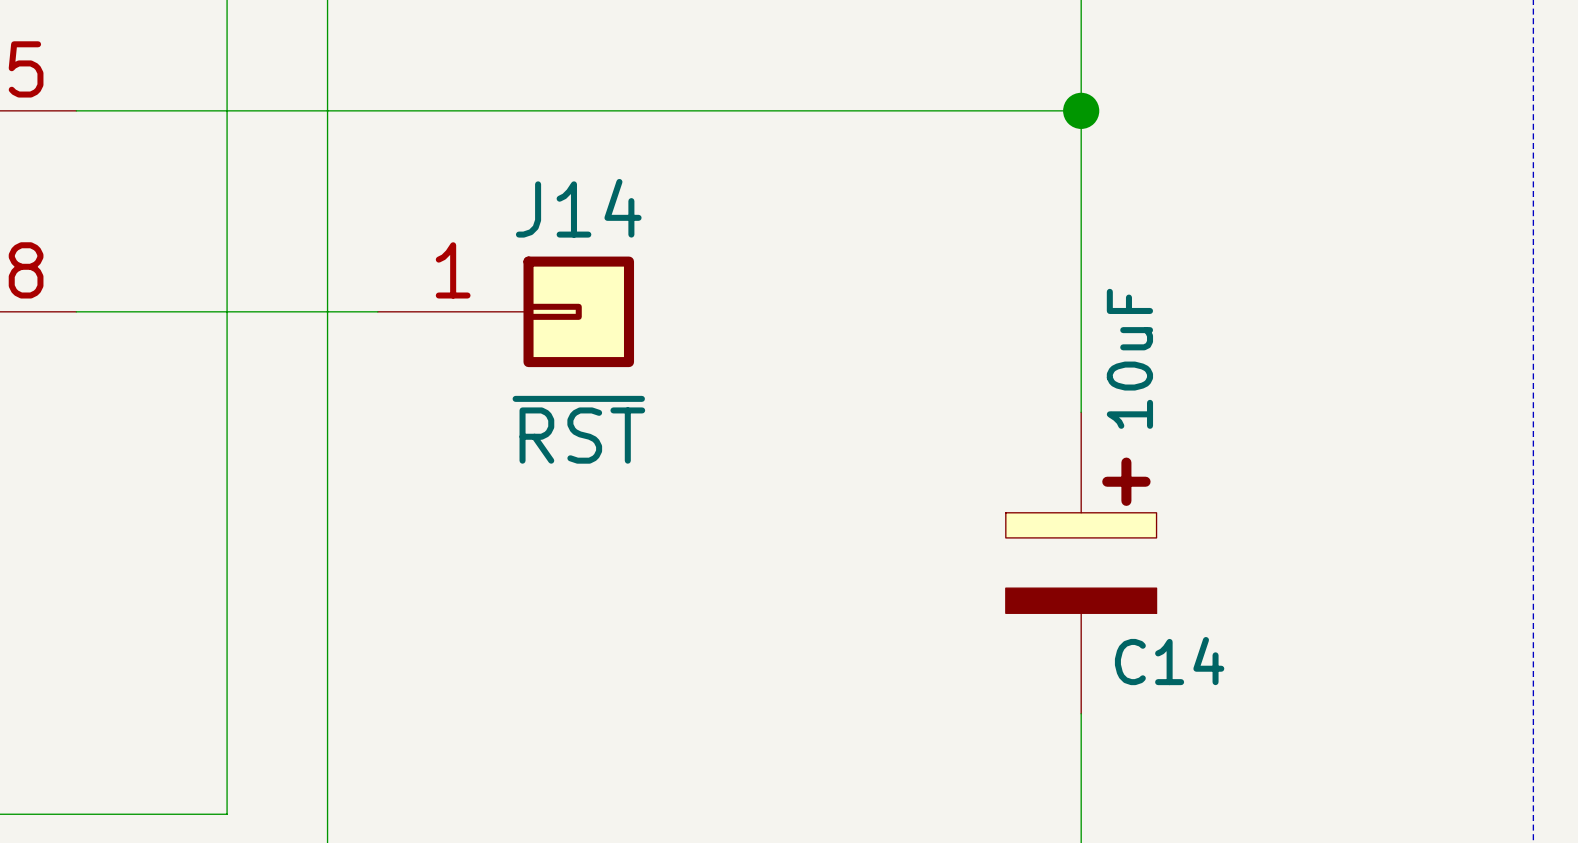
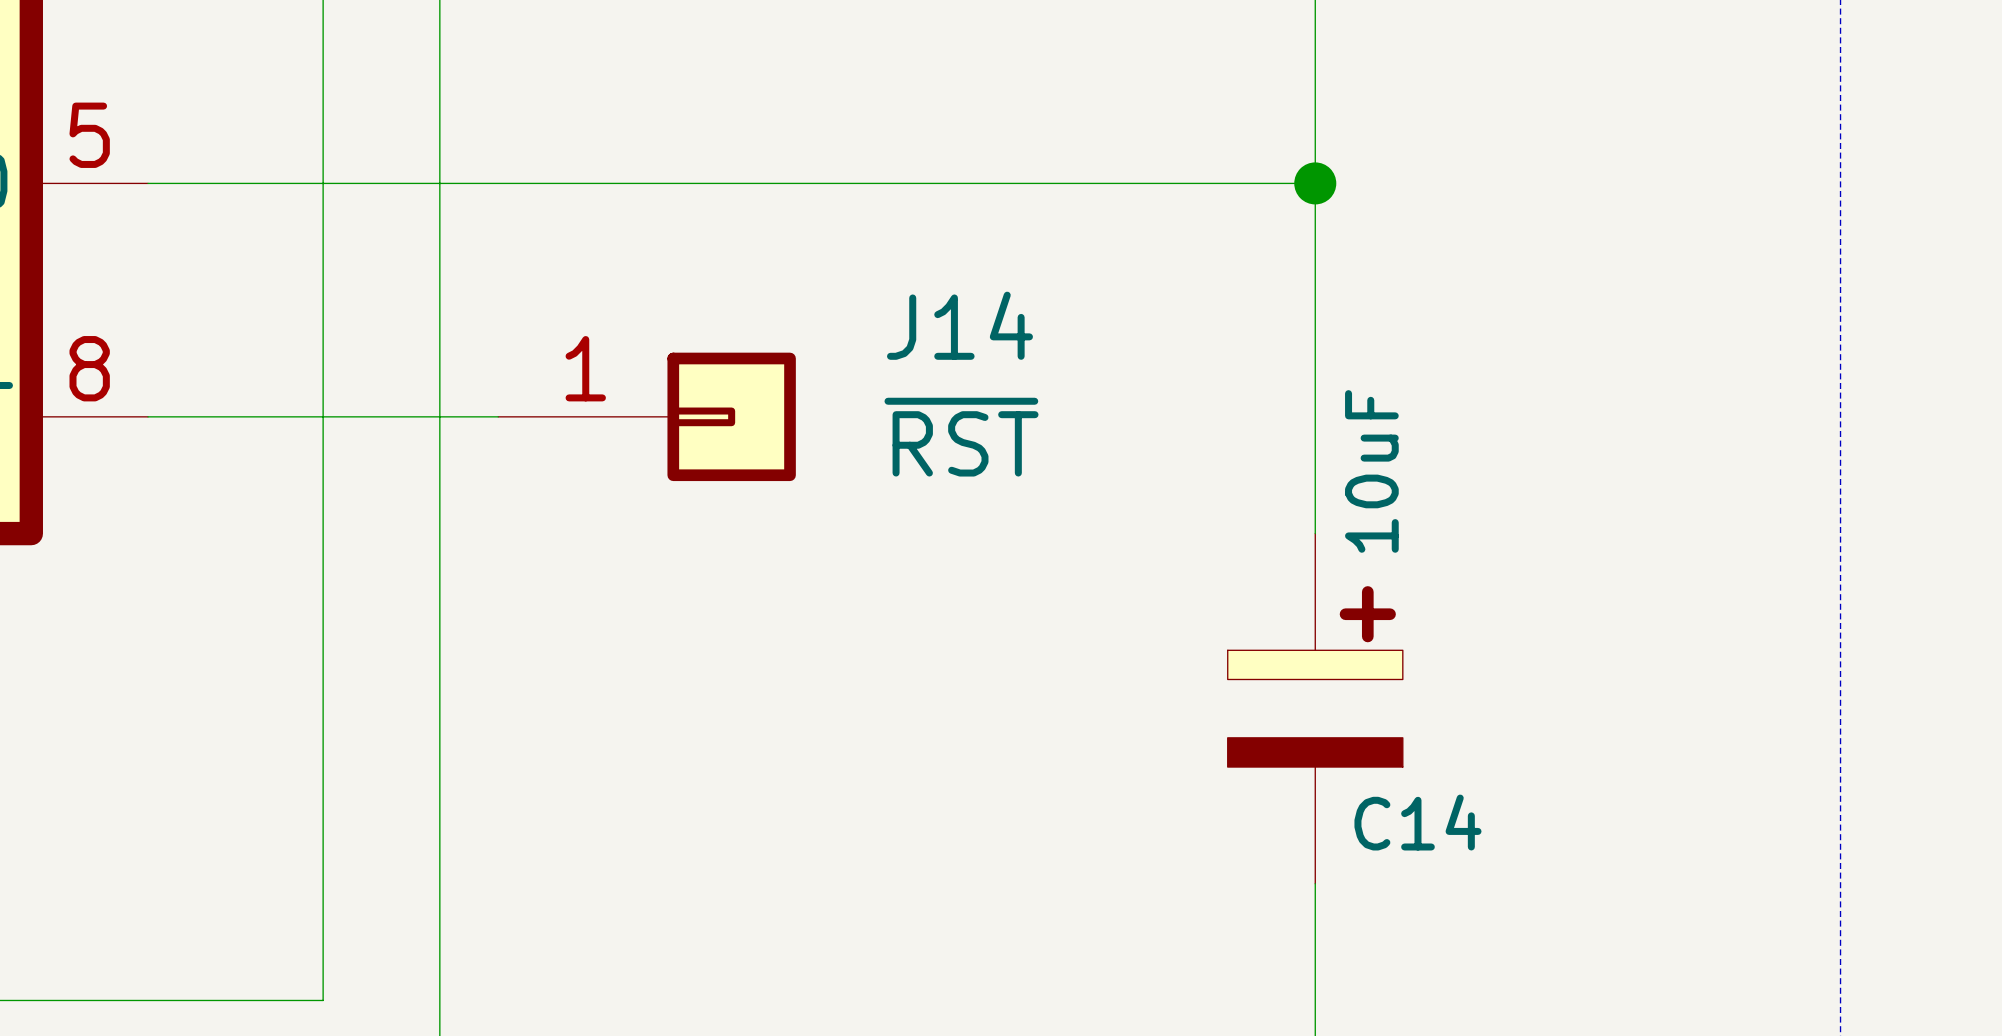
J14 name position: J14 (578, 208) -> J14 (959, 325)
J14 value position: ~{RST} (578, 429) -> ~{RST} (961, 437)

